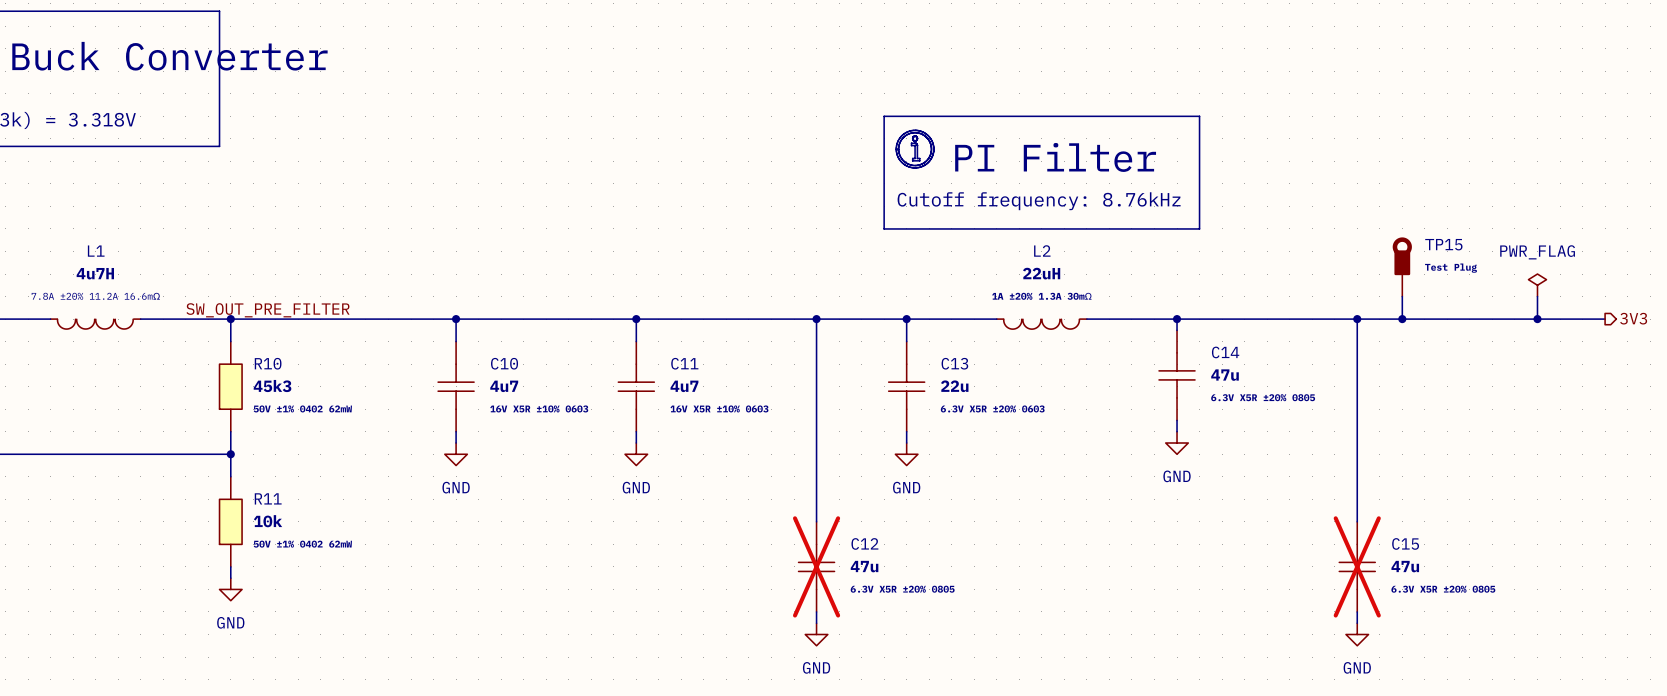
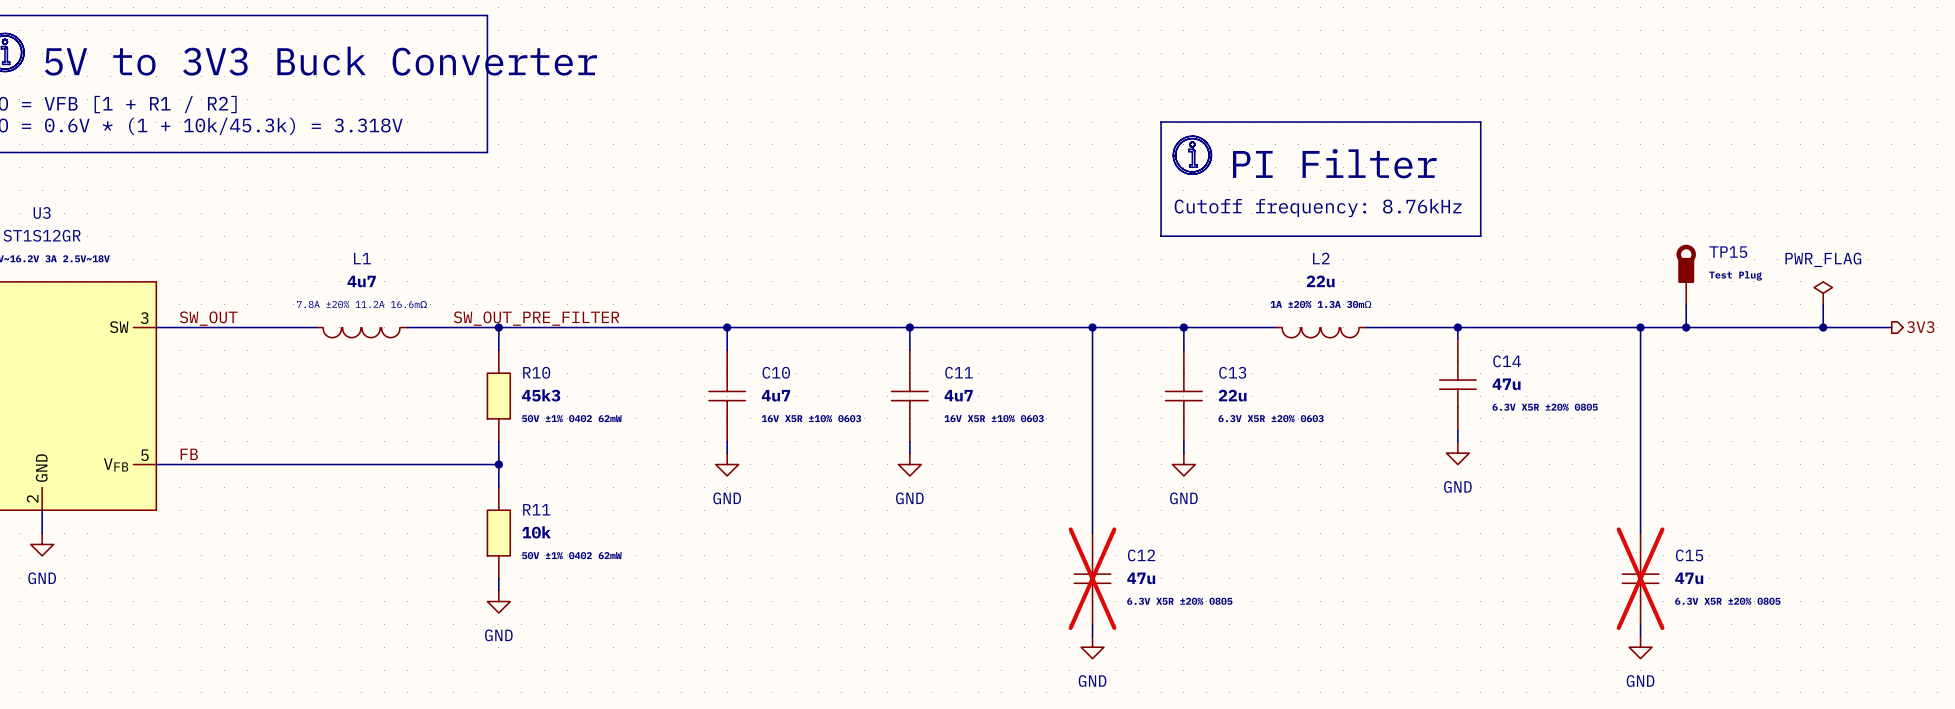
L1 value: 4u7H (95, 273) -> 4u7 (361, 281)
L2 value: 22uH (1041, 273) -> 22u (1320, 281)

